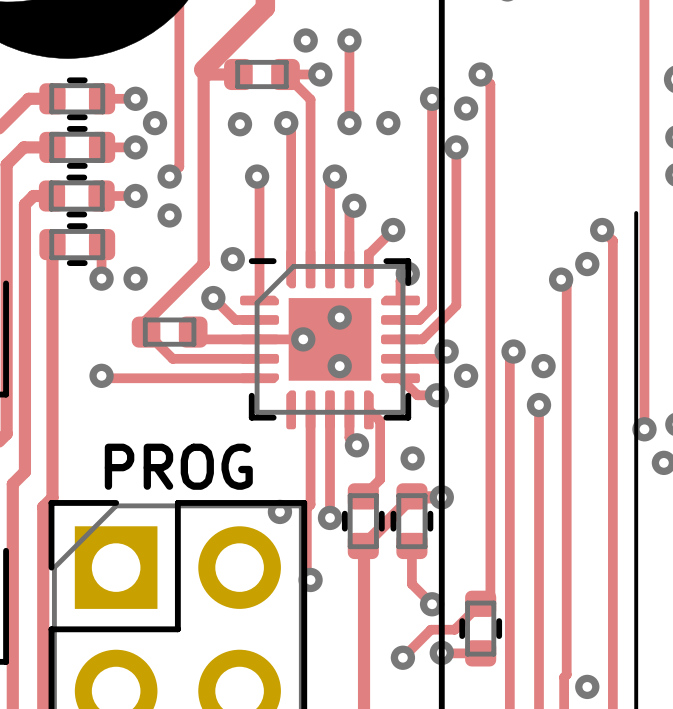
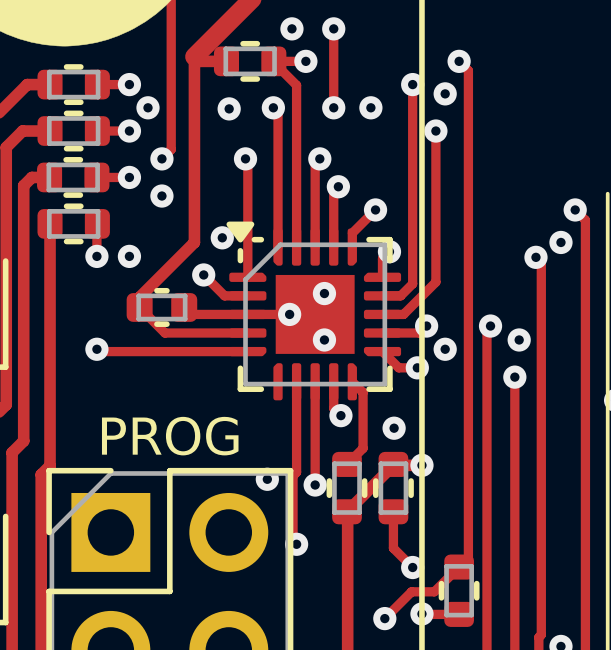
part footprint: [224, 58, 300, 91] -> [213, 40, 287, 82]
part footprint: [240, 249, 420, 430] -> [226, 221, 402, 401]
part footprint: [131, 316, 208, 348] -> [126, 287, 198, 327]

